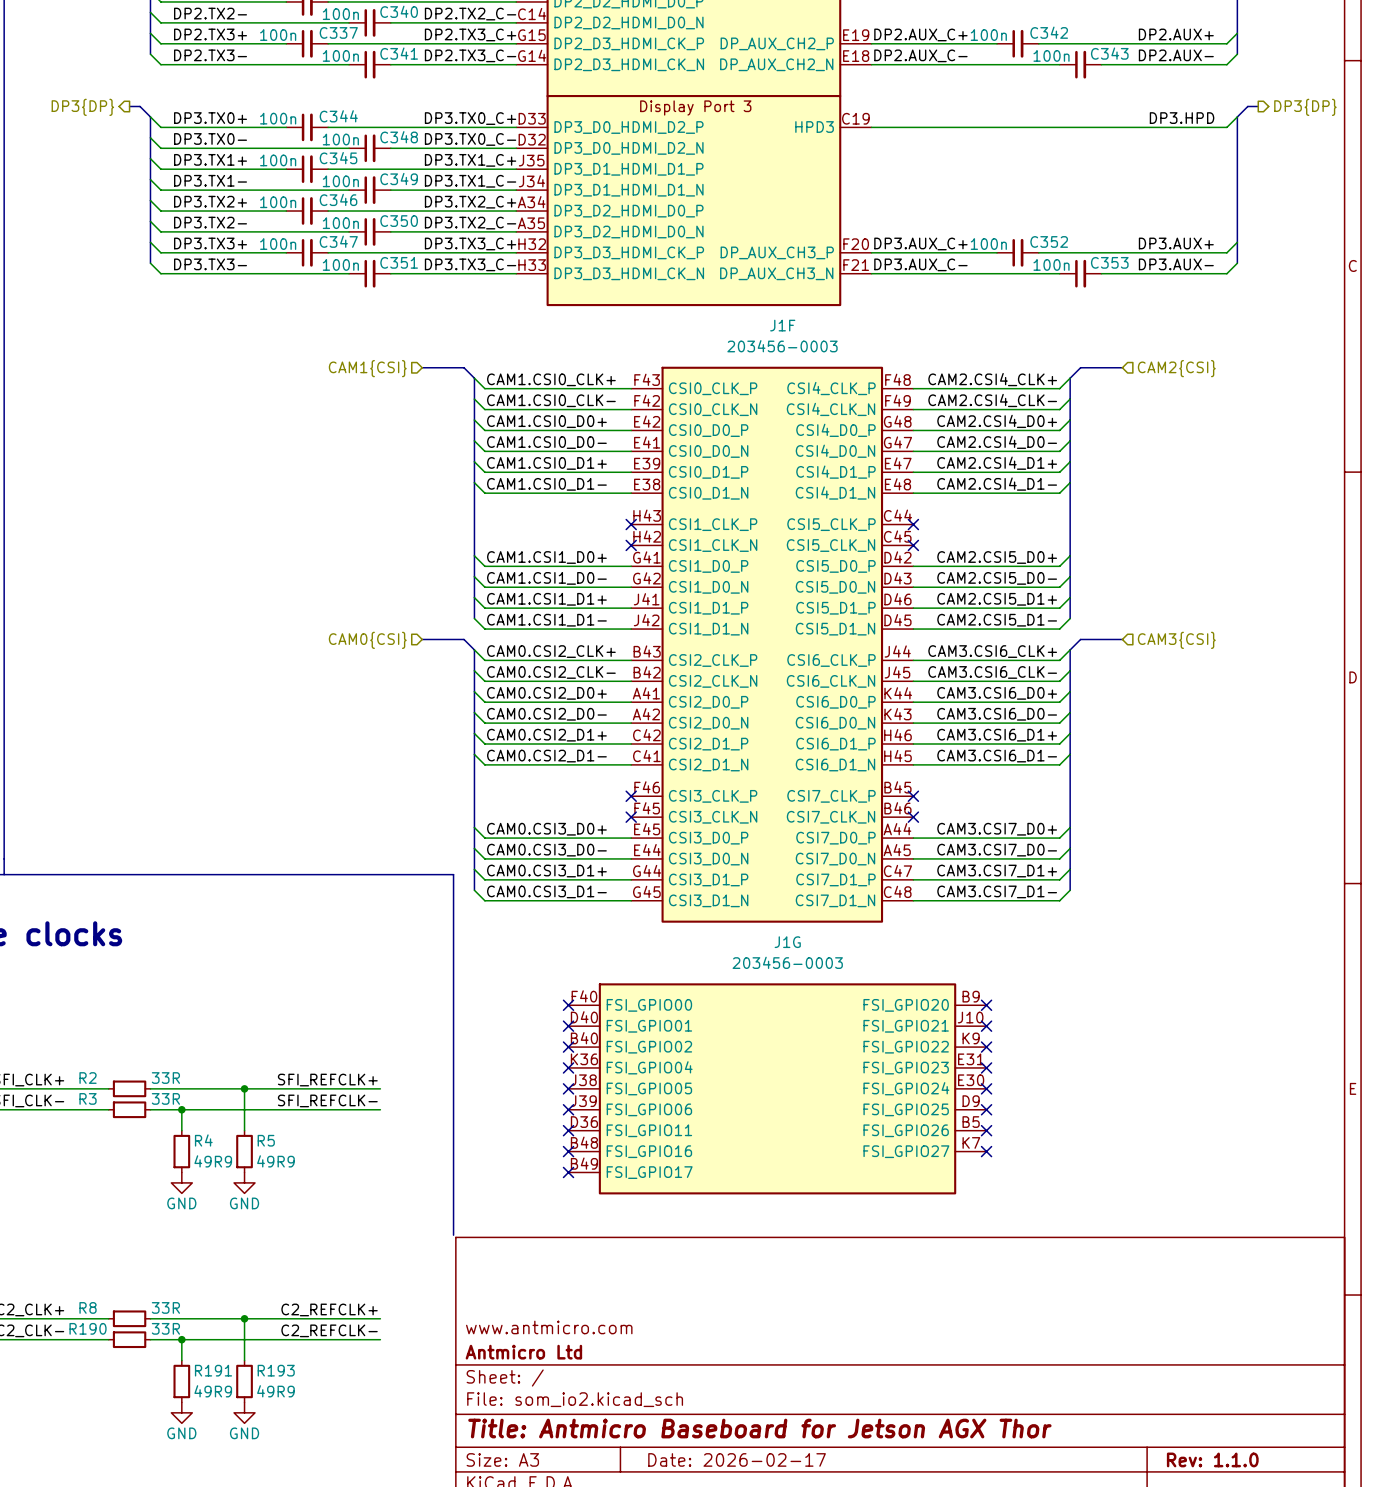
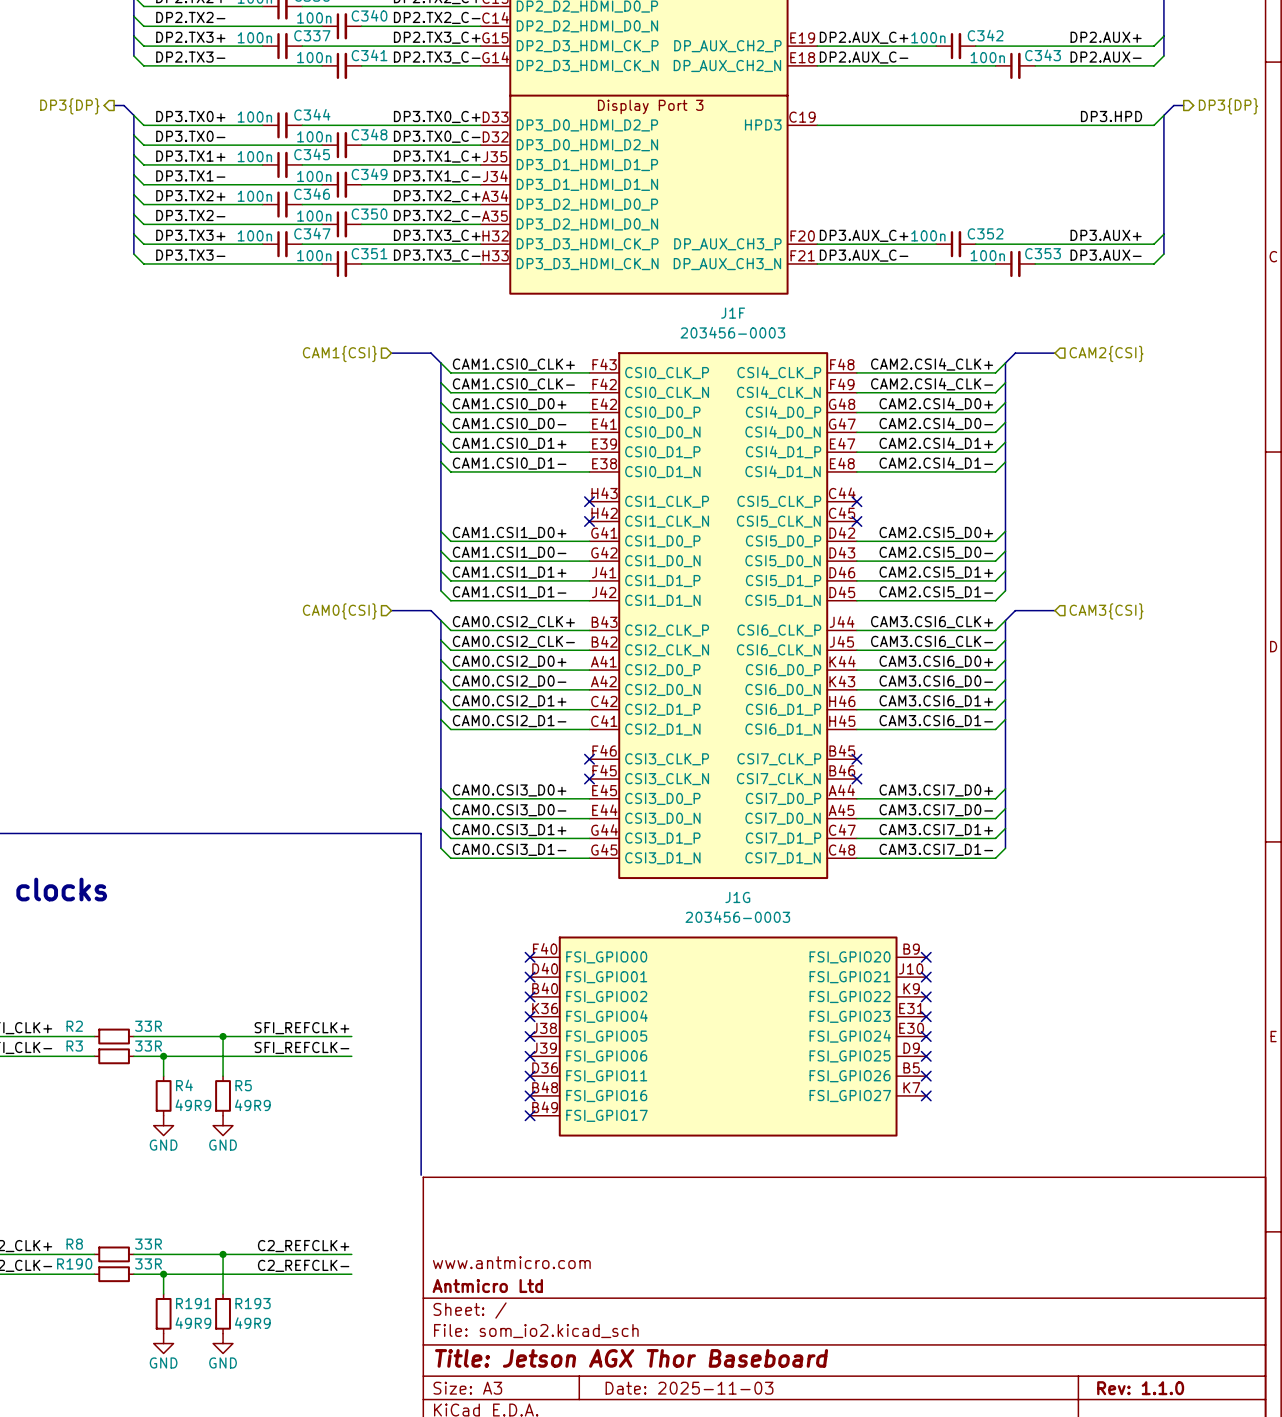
title block: Title: Antmicro Baseboard for Jetson AGX Thor (759, 1428) -> Title: Jetson AGX Thor Baseboard (631, 1358)
title block: Date: 2026-02-17 (737, 1459) -> Date: 2025-11-03 (689, 1388)

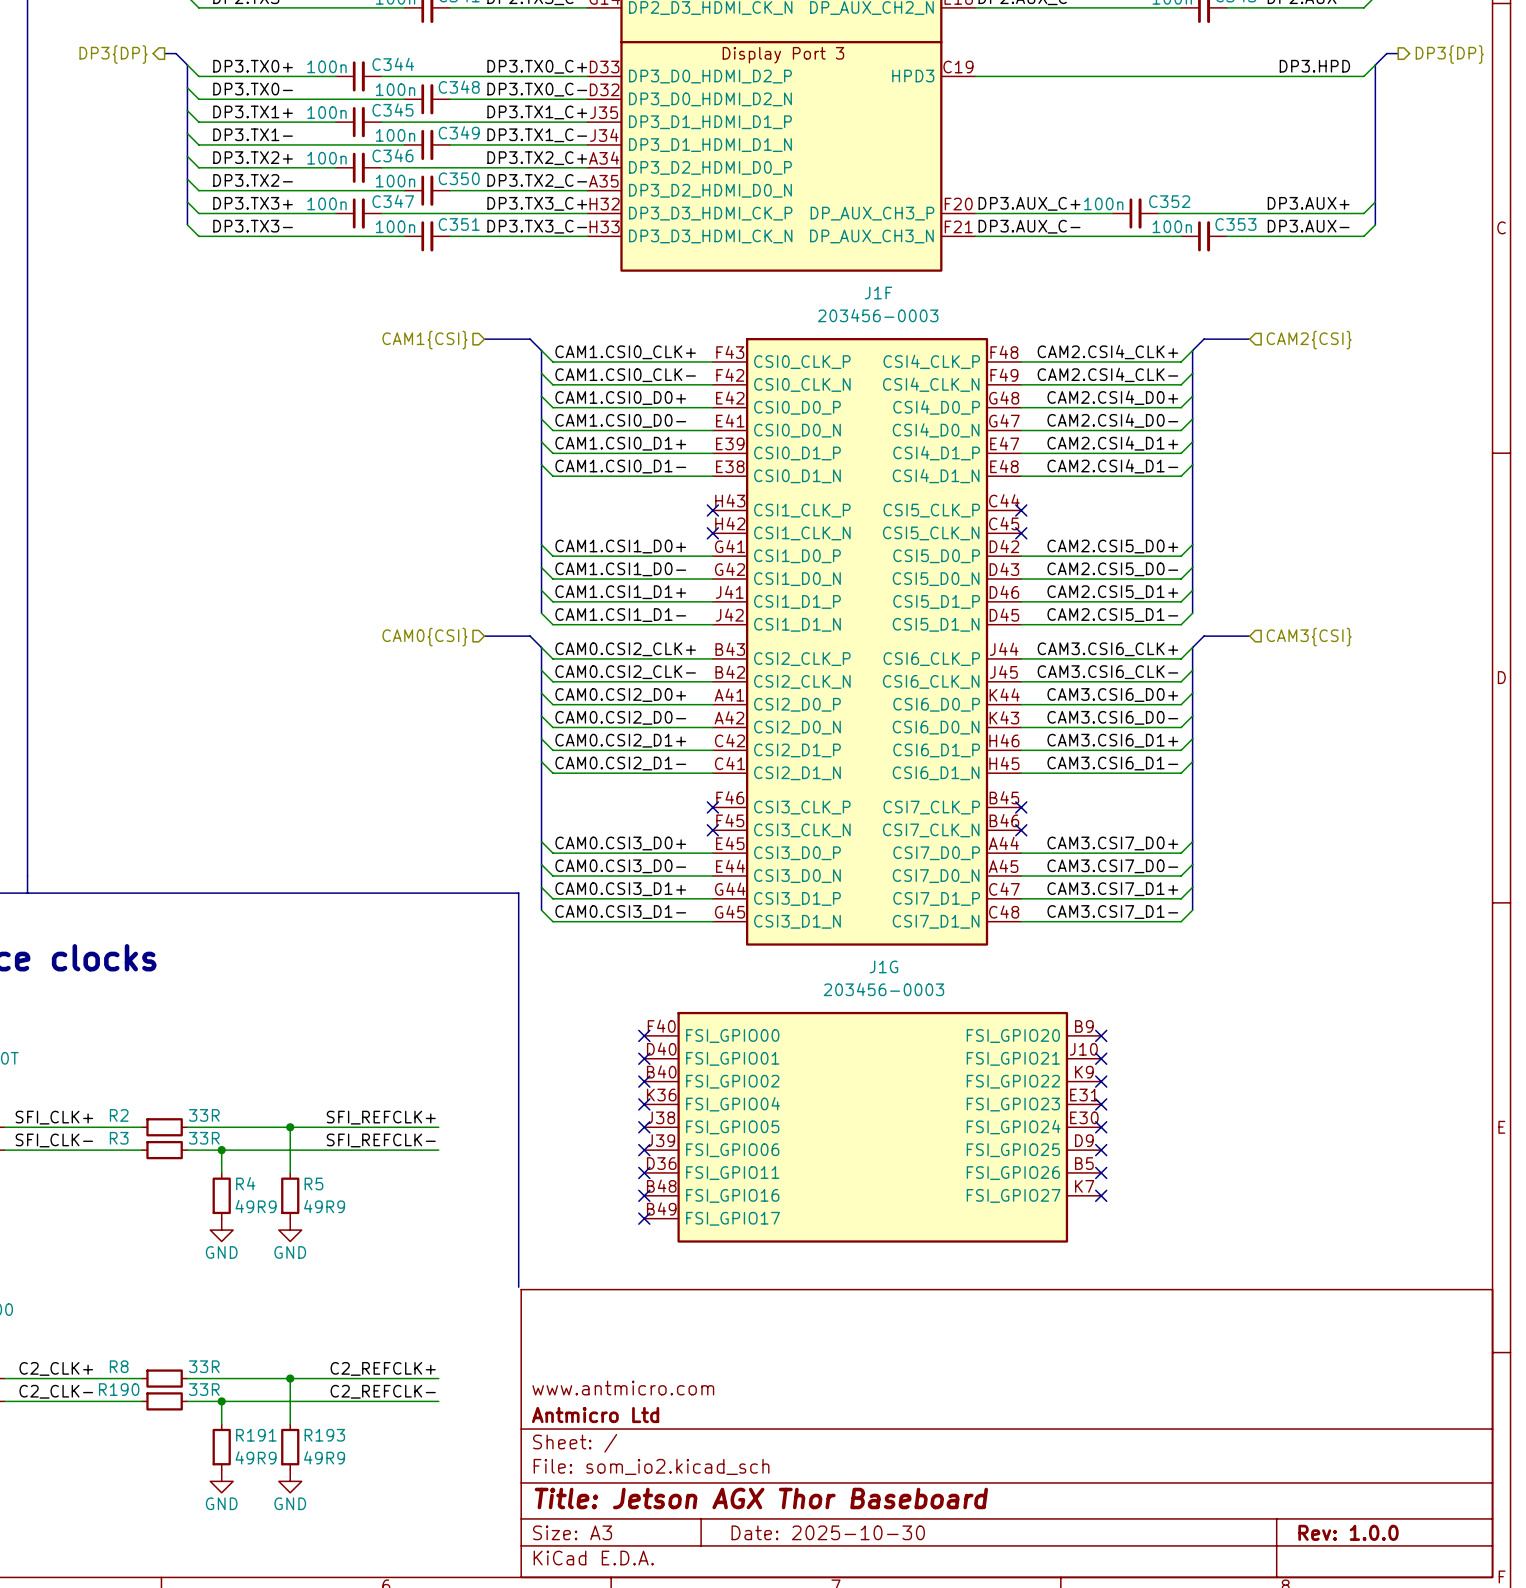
title block: Date: 2025-11-03 (689, 1388) -> Date: 2025-10-30 (828, 1532)
title block: Rev: 1.1.0 (1140, 1388) -> Rev: 1.0.0 (1348, 1532)

